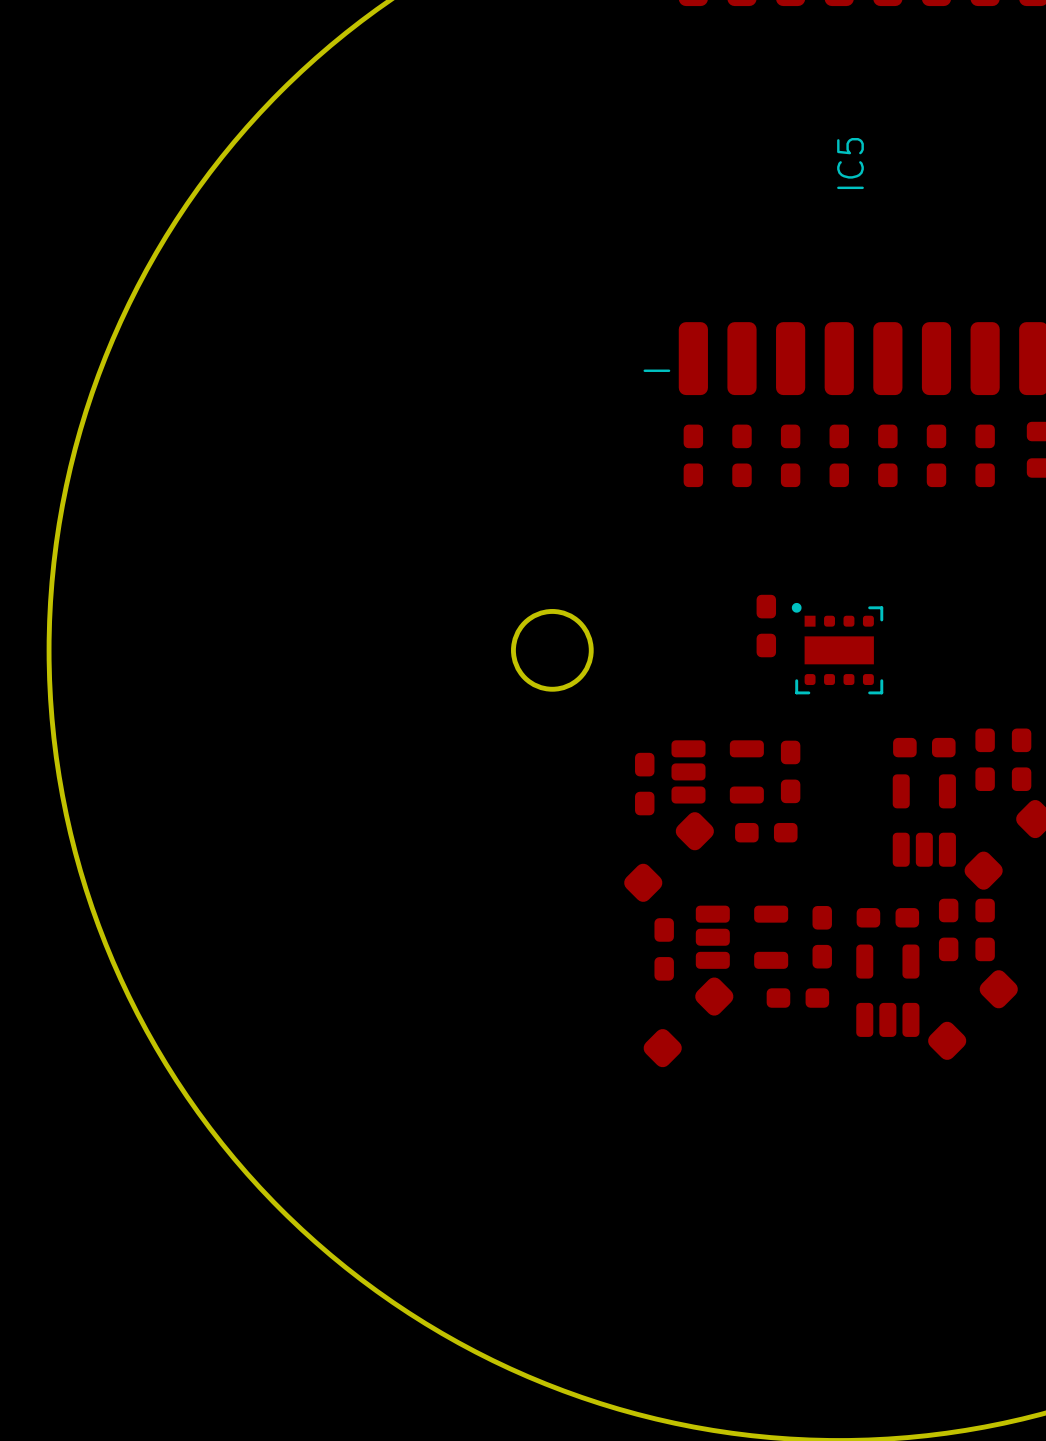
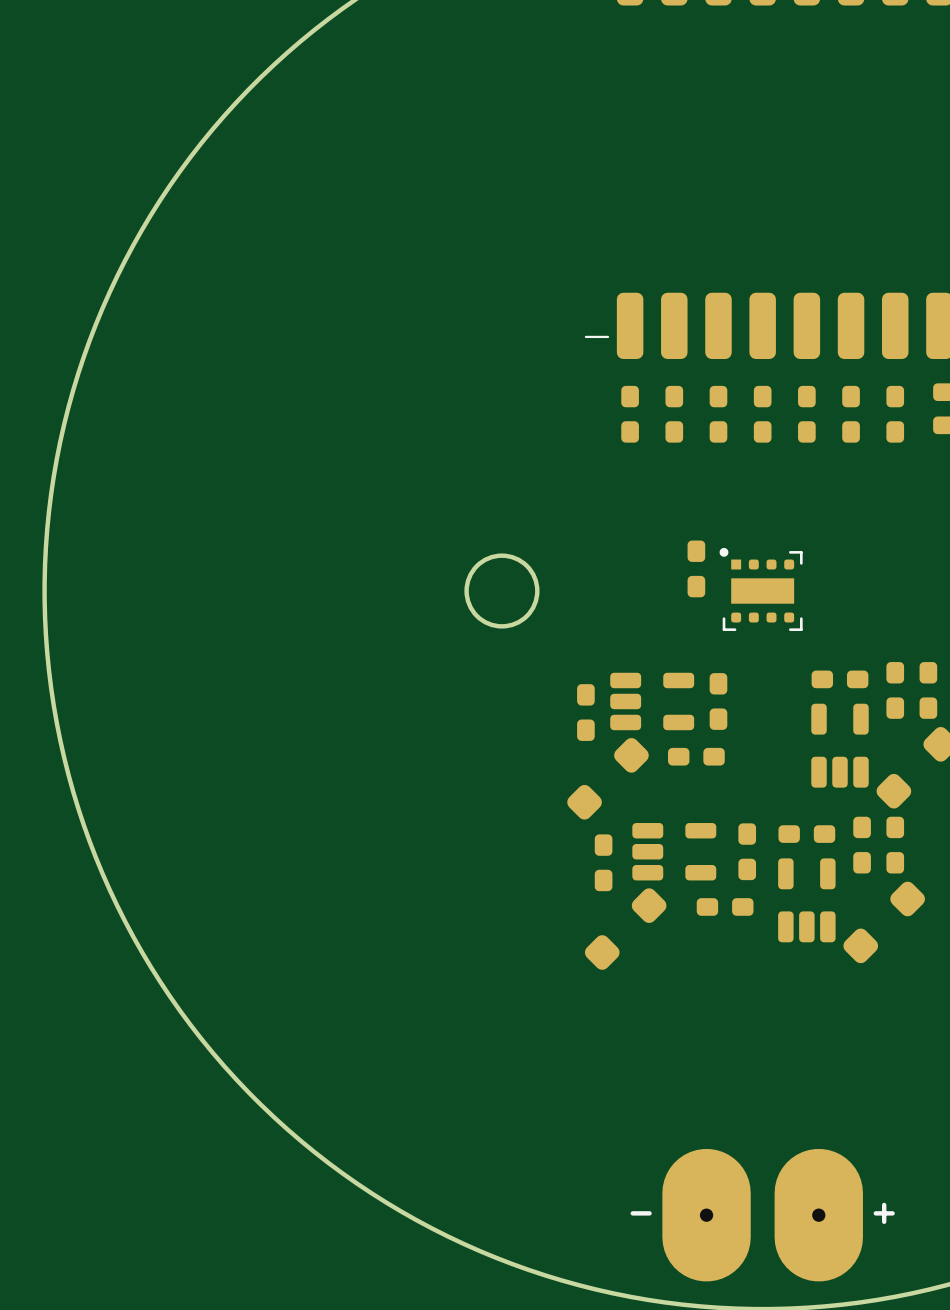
IC5 name: IC5 (850, 163) -> none
part: none -> (762, 1215)

